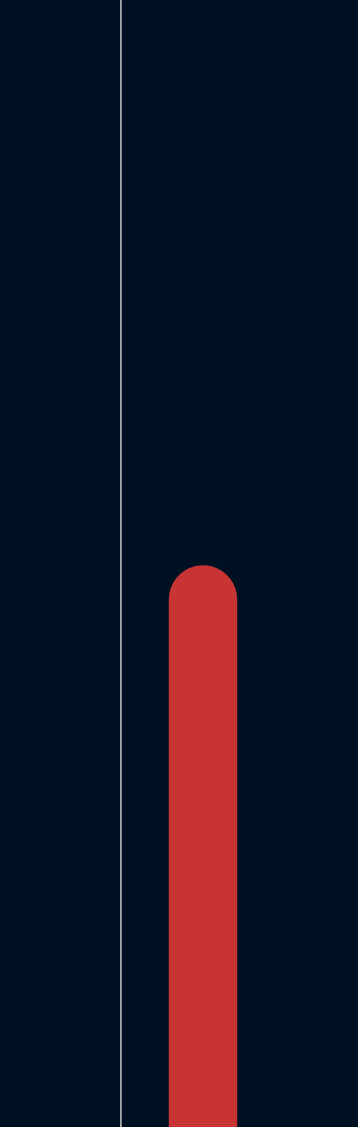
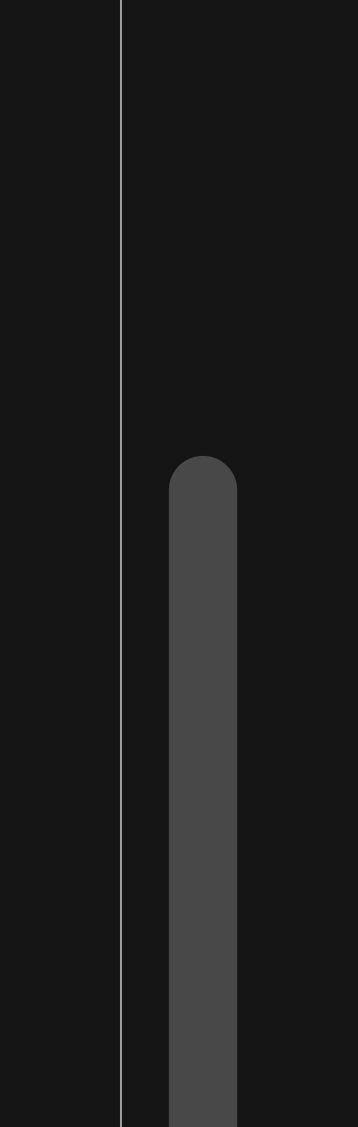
track: none -> (202, 490) (202, 599)

